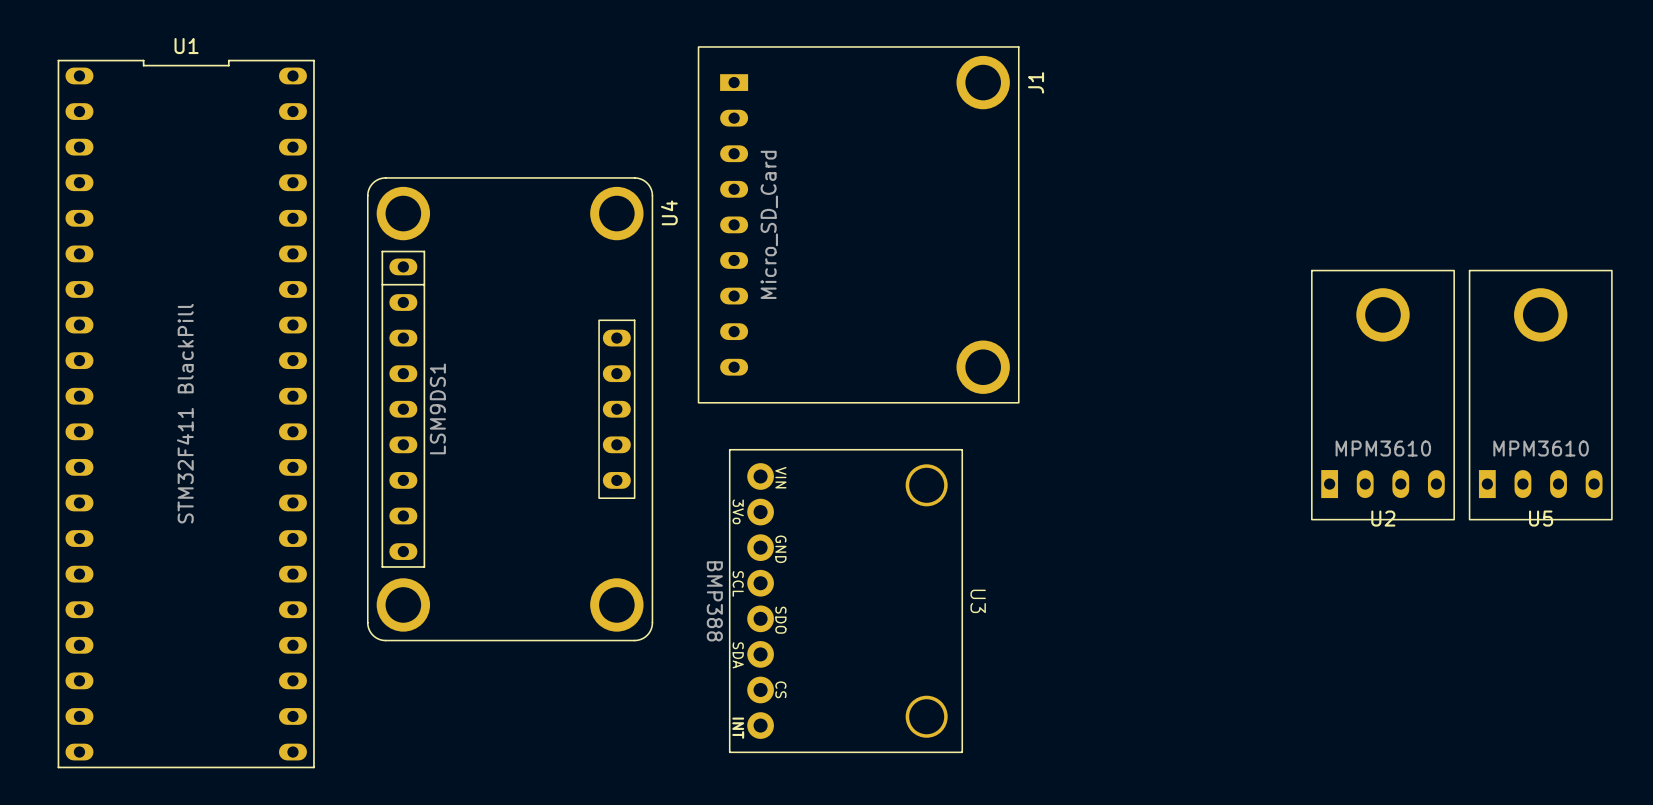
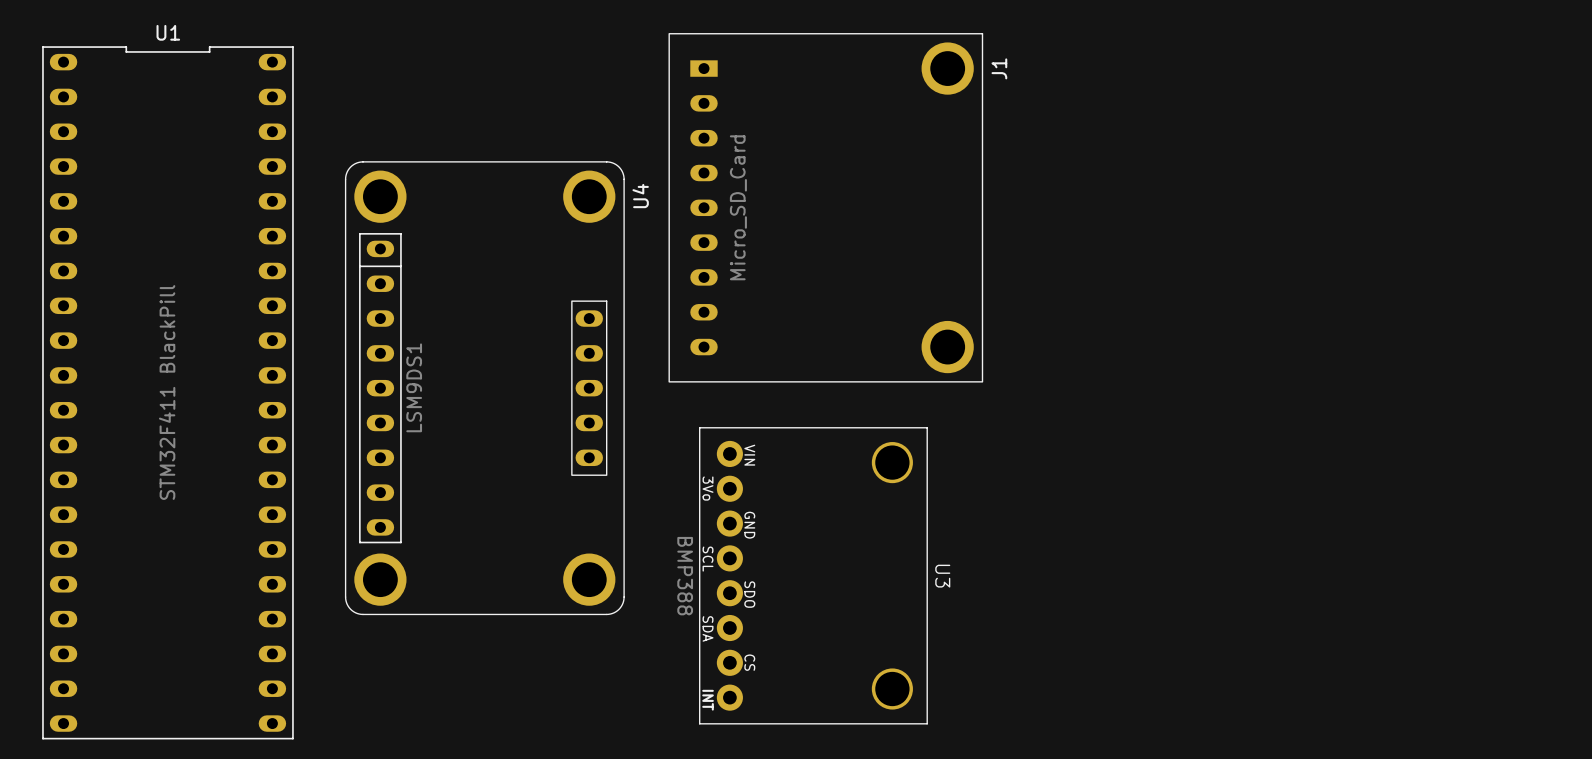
U2: MPM3610 (1382, 395) -> none
U5: MPM3610 (1540, 395) -> none

